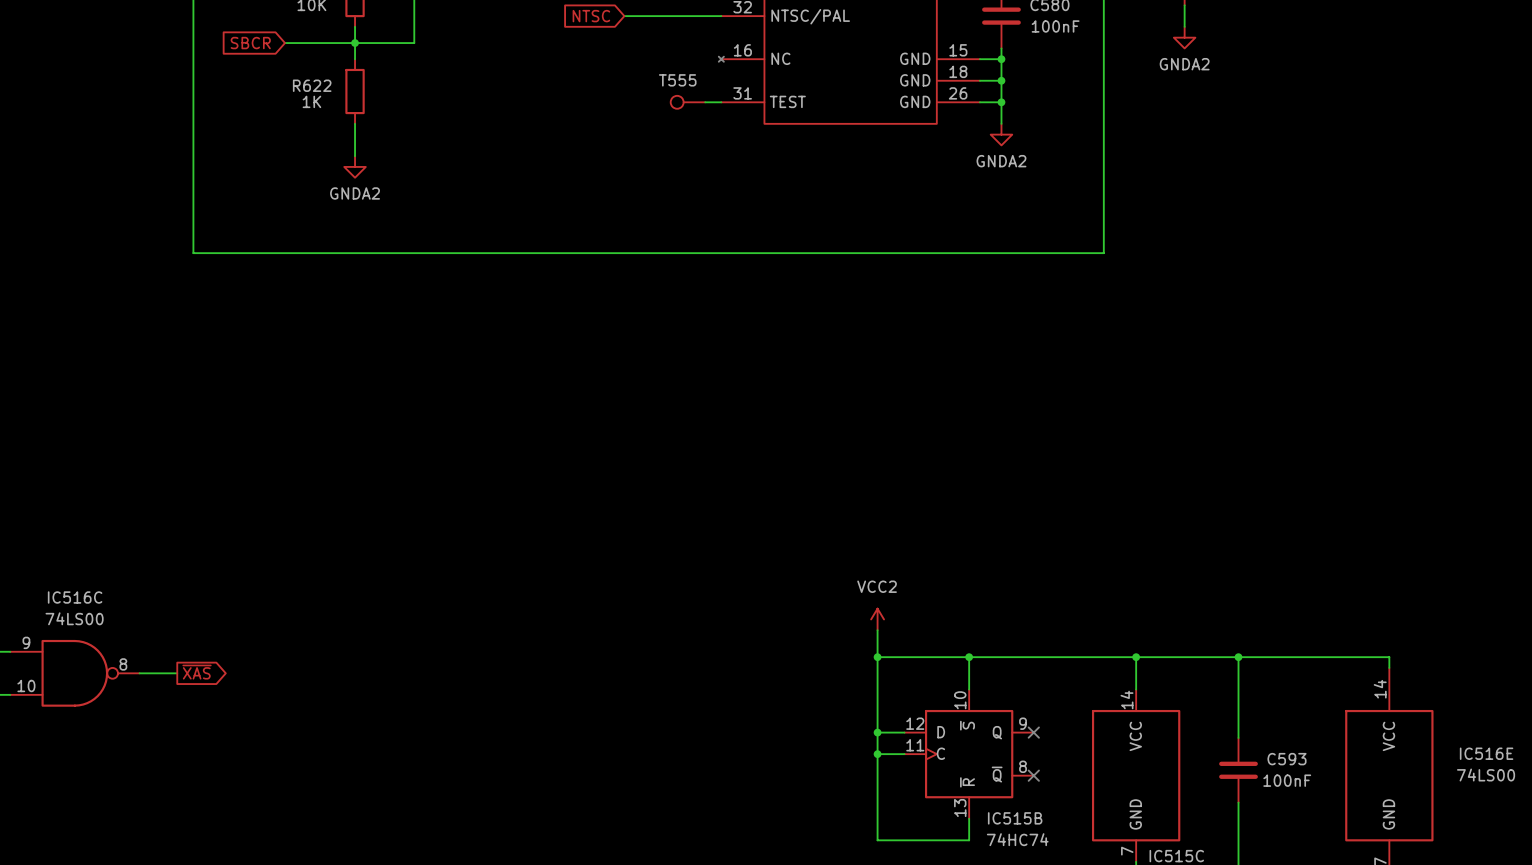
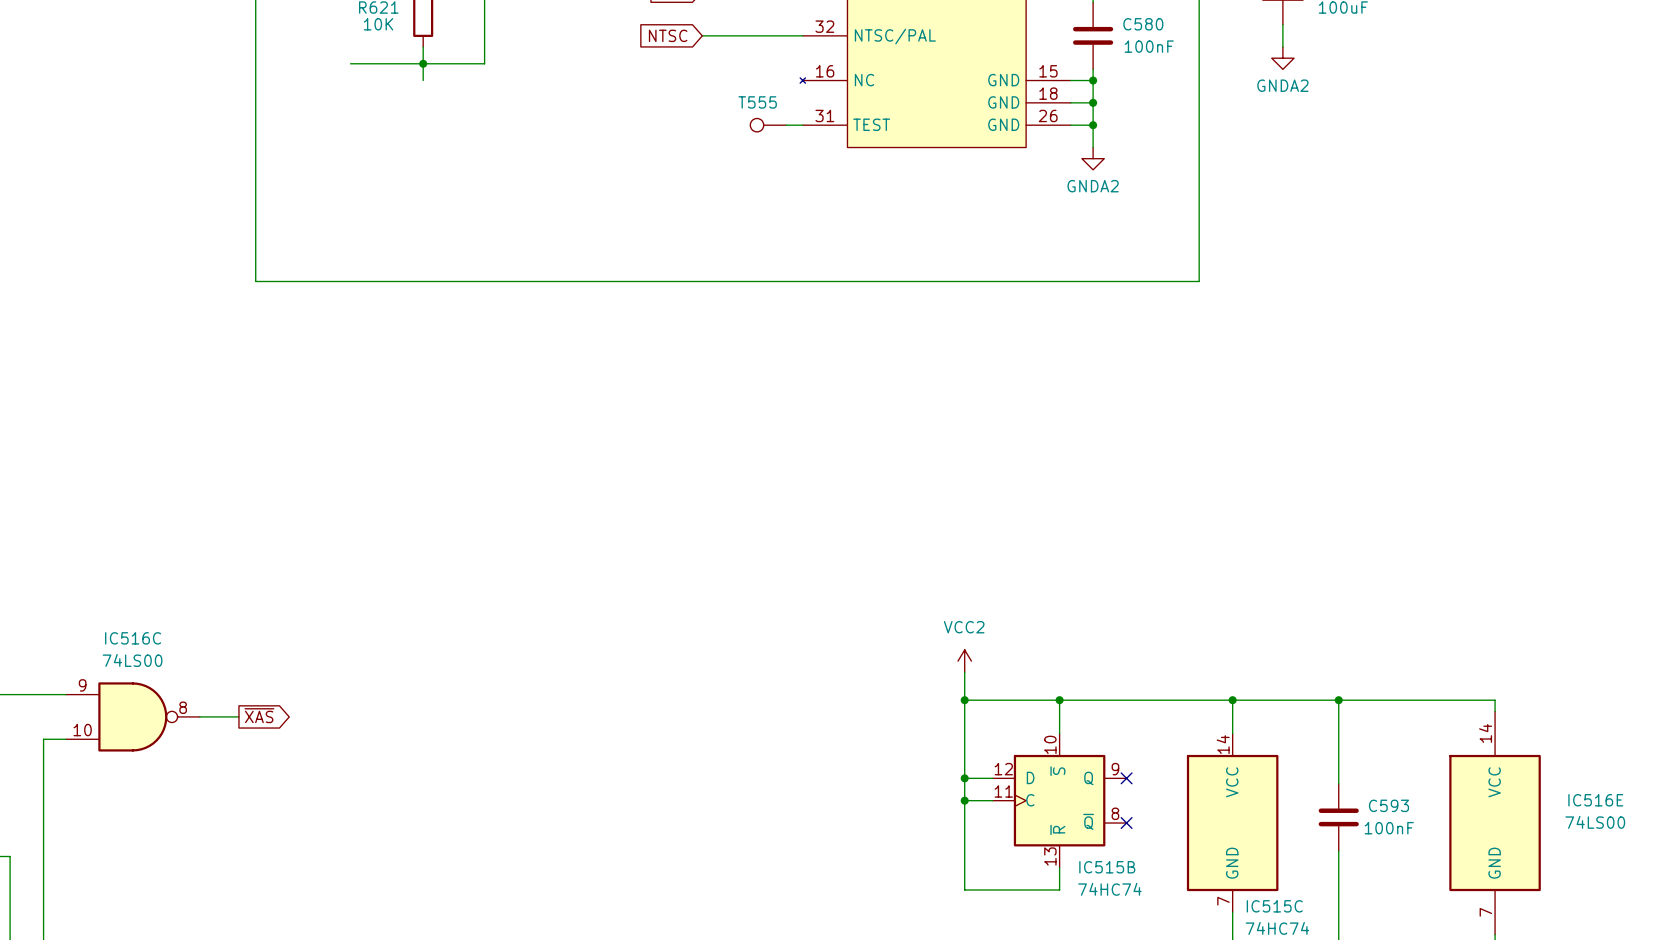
global label: SBCR (250, 43) -> none
R622: 1K (355, 91) -> none
wire: (355, 123) (355, 156) -> none
power symbol: GNDA2 (355, 166) -> none

